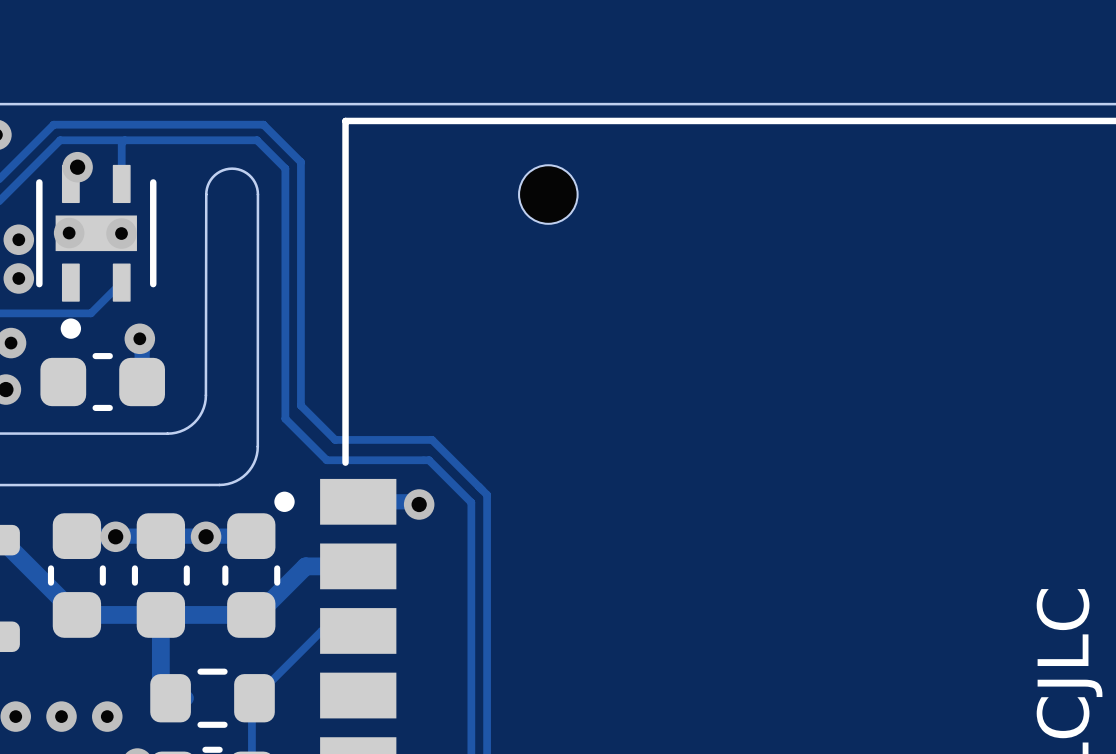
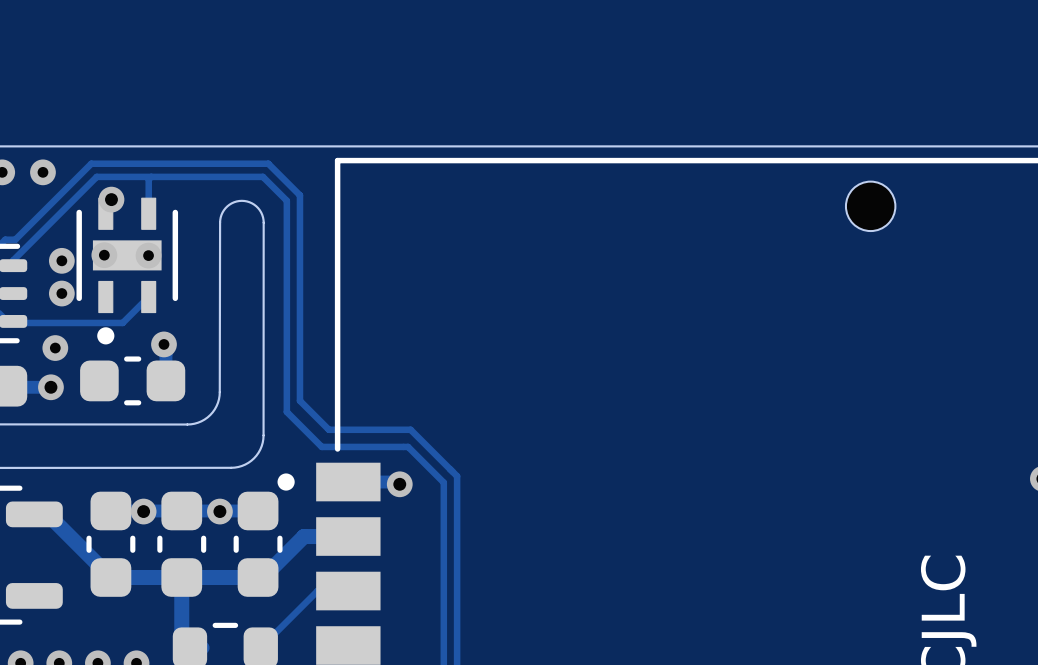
part position: (548, 194) -> (870, 206)

